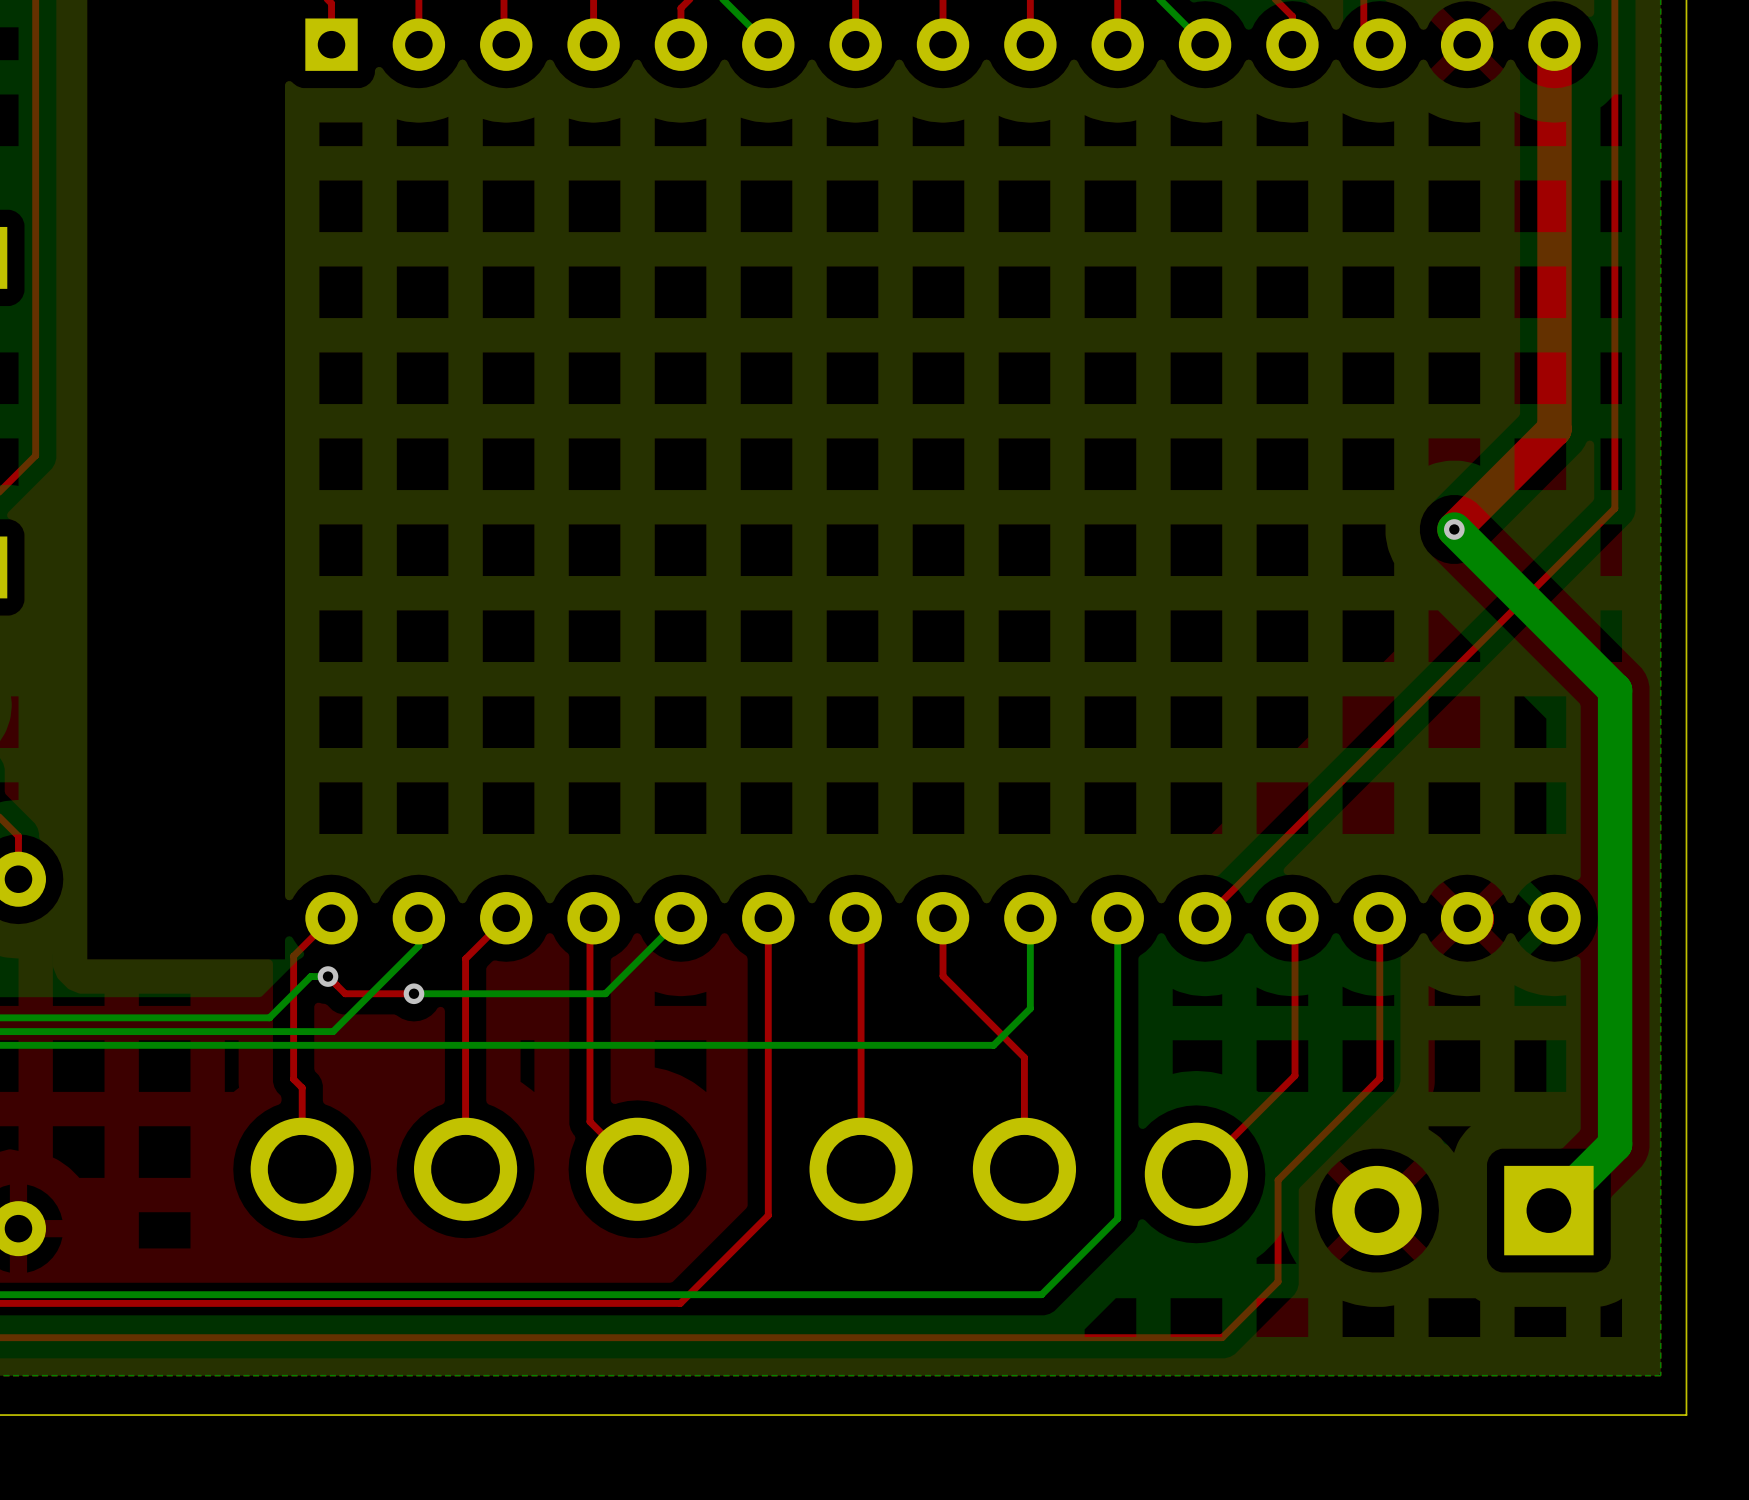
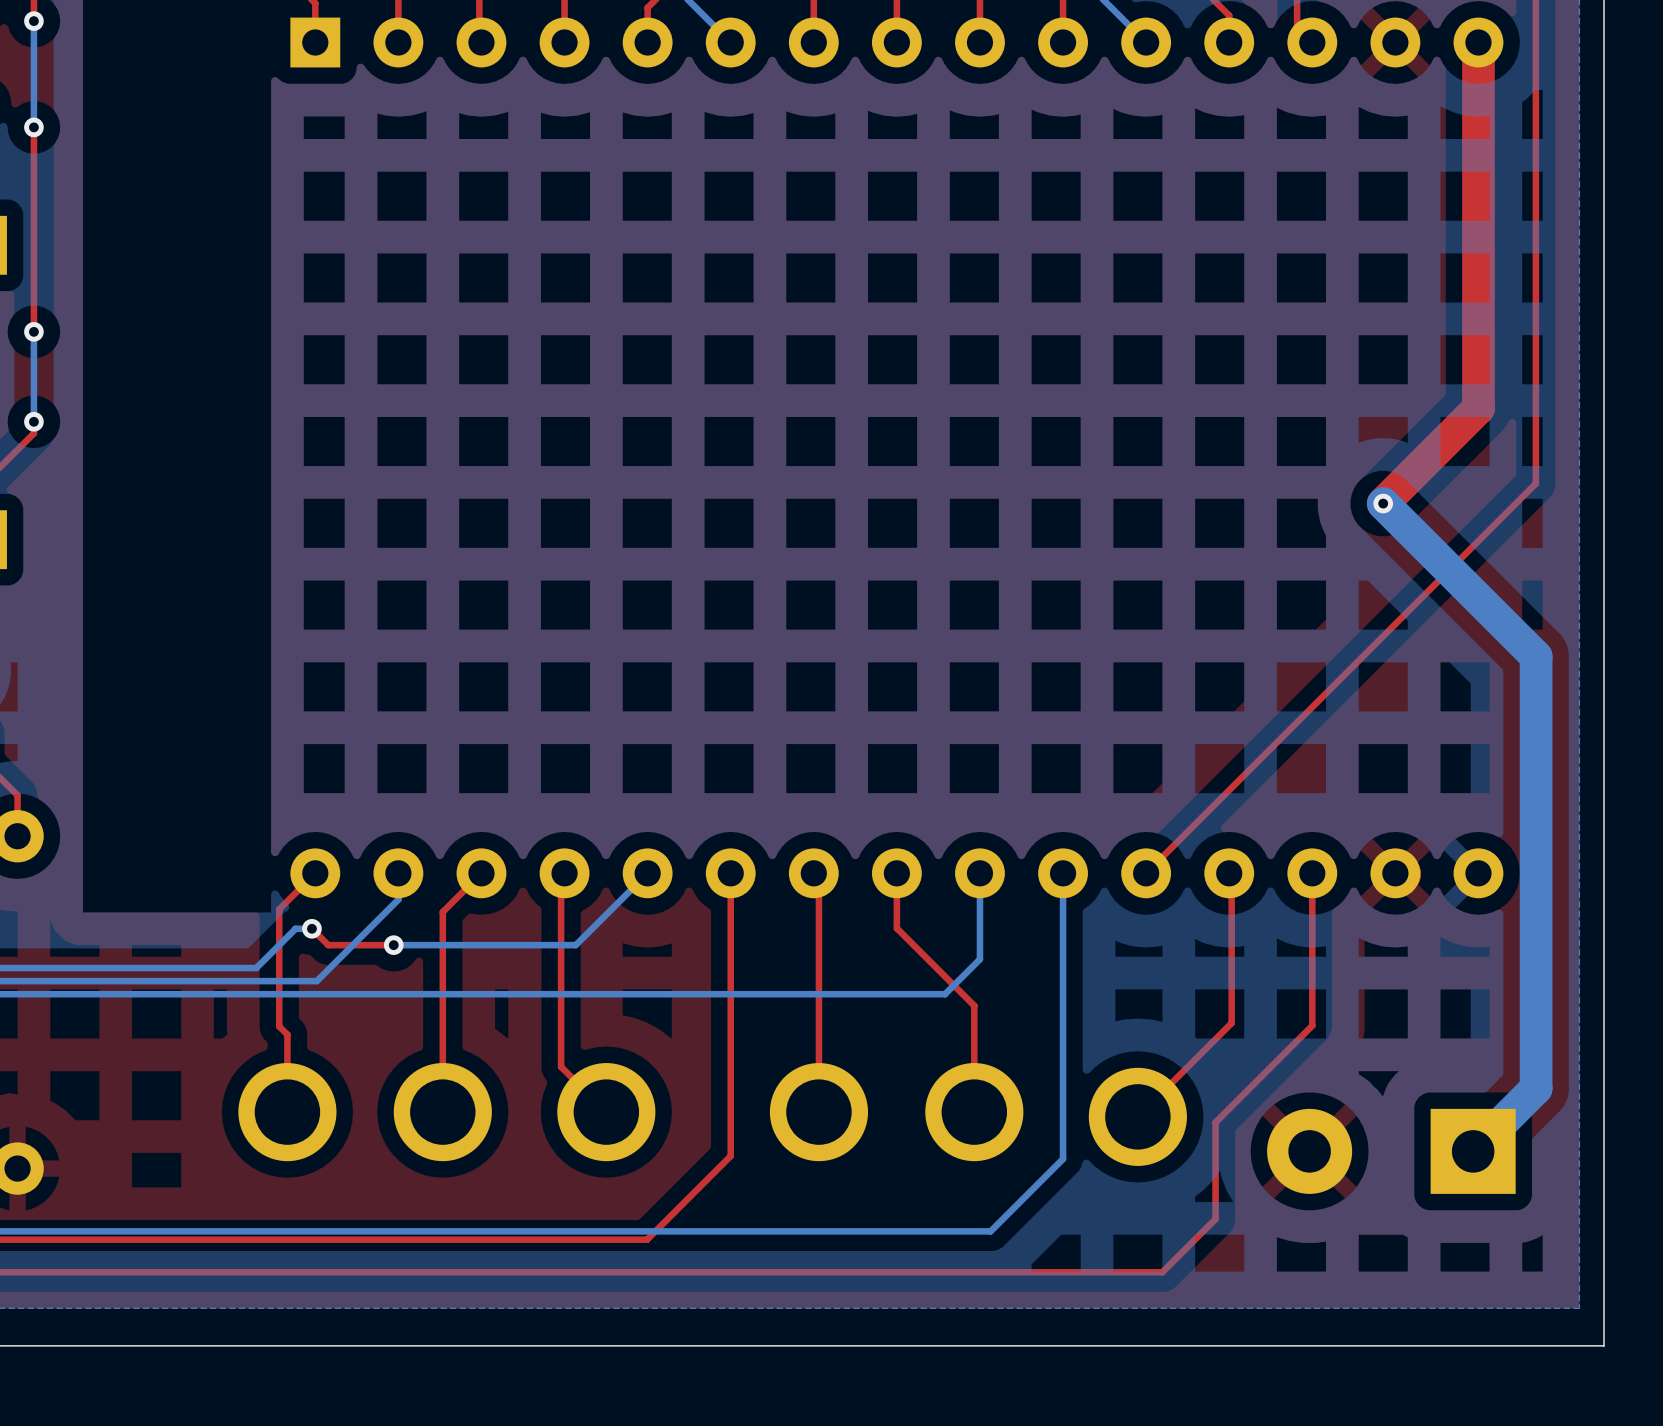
top track: (35, 22) (35, 133) -> none
bottom track: none -> (33, 21) (33, 127)
via: none -> (33, 21)
via: none -> (33, 127)
top track: (35, 348) (35, 443) -> none
bottom track: none -> (33, 331) (33, 421)
via: none -> (33, 331)
via: none -> (33, 421)

